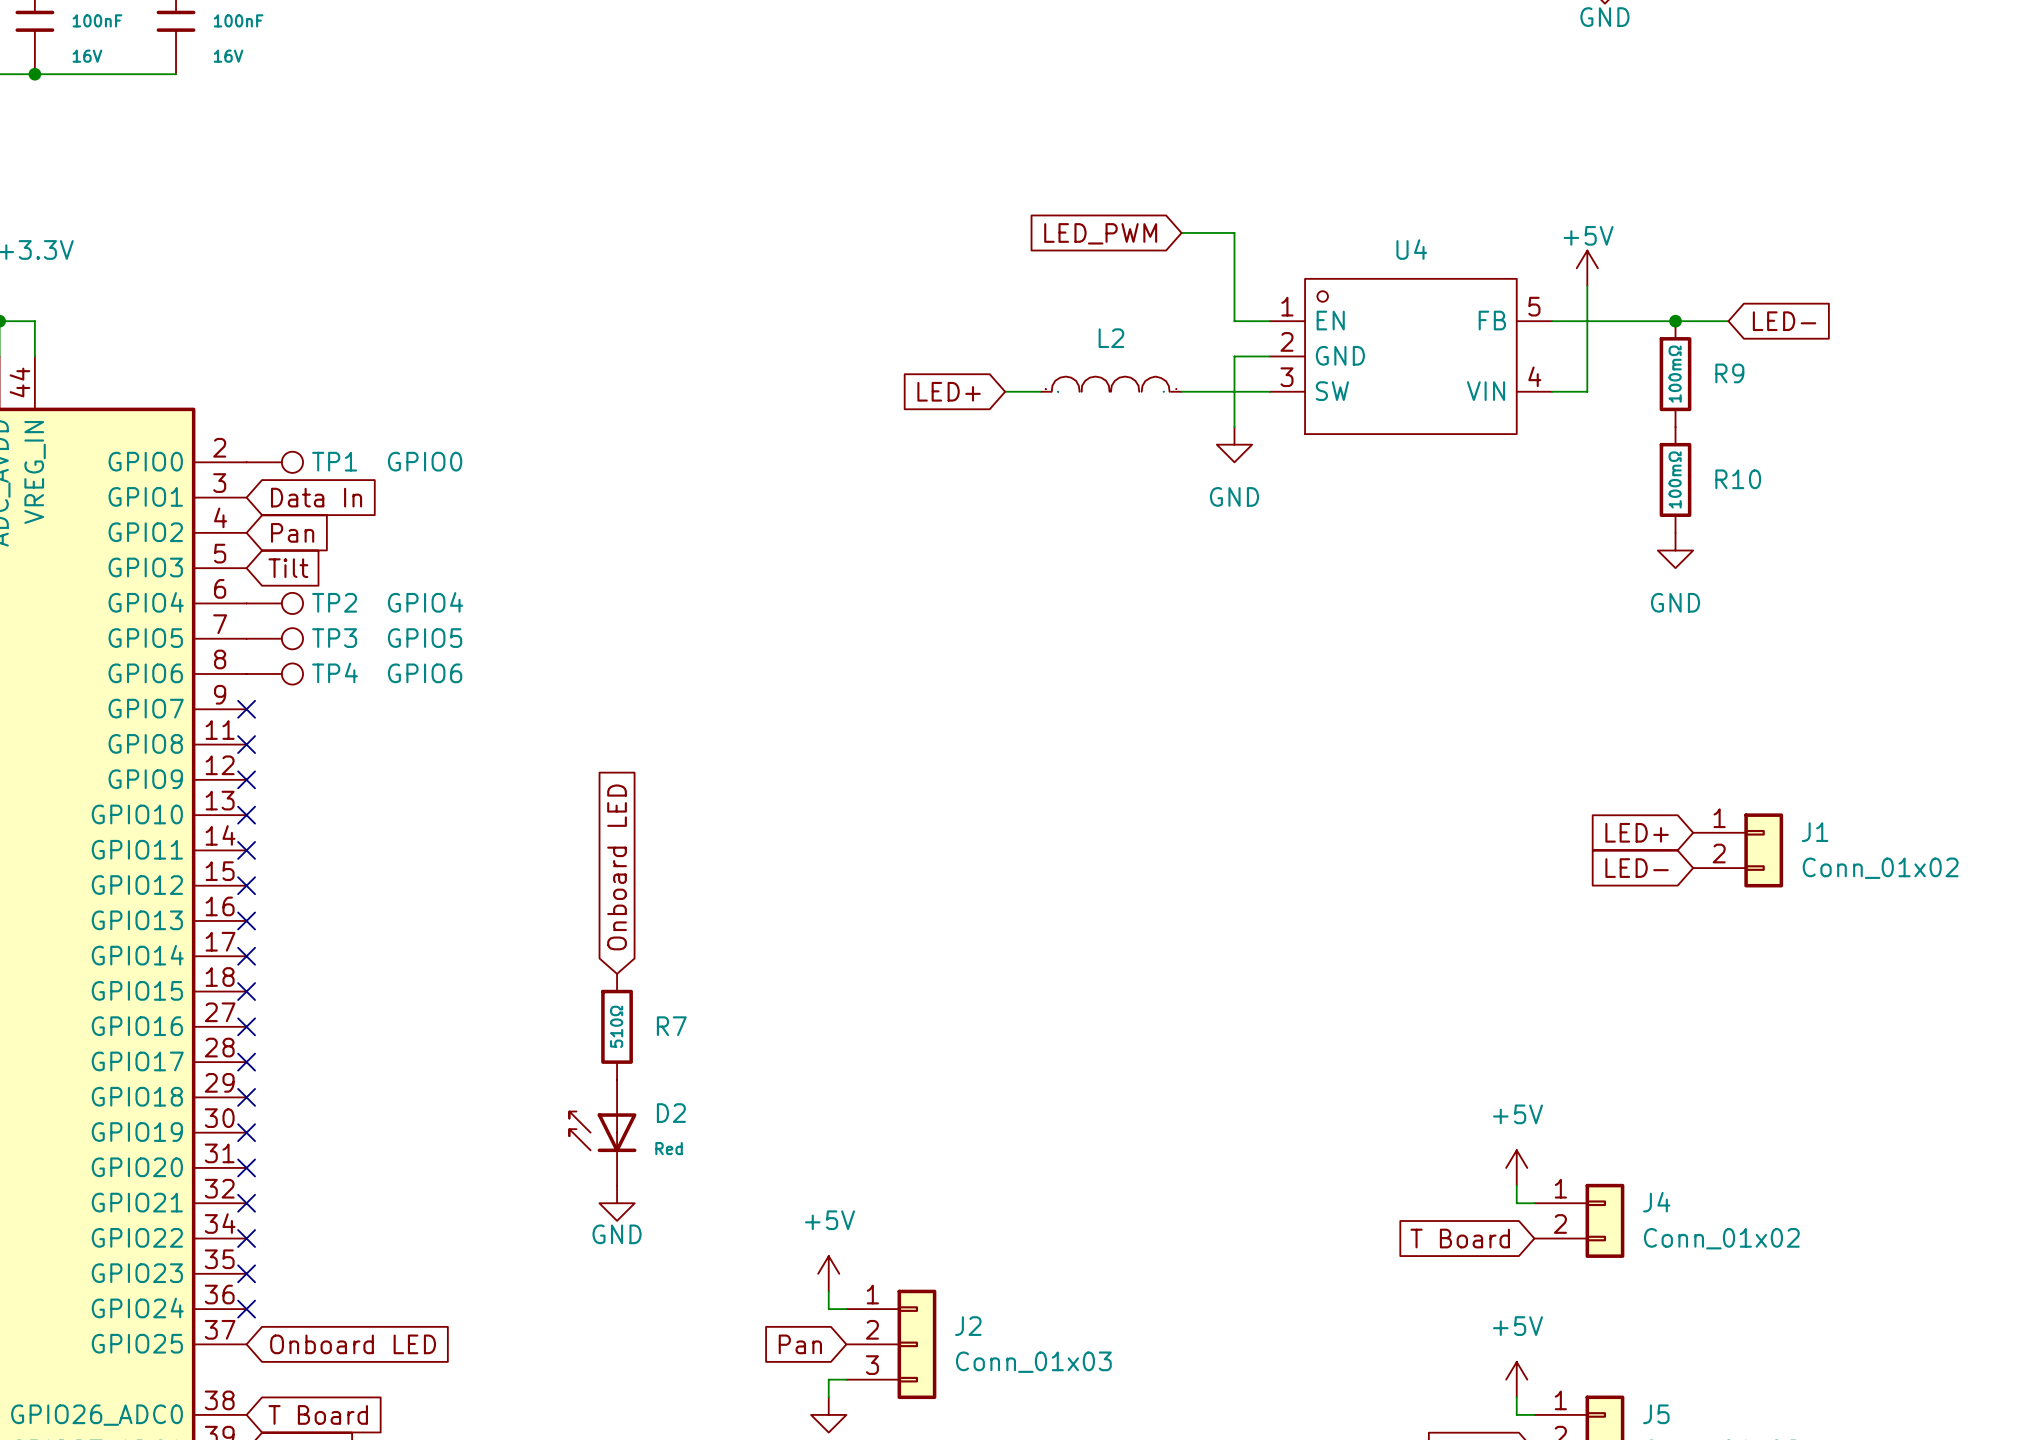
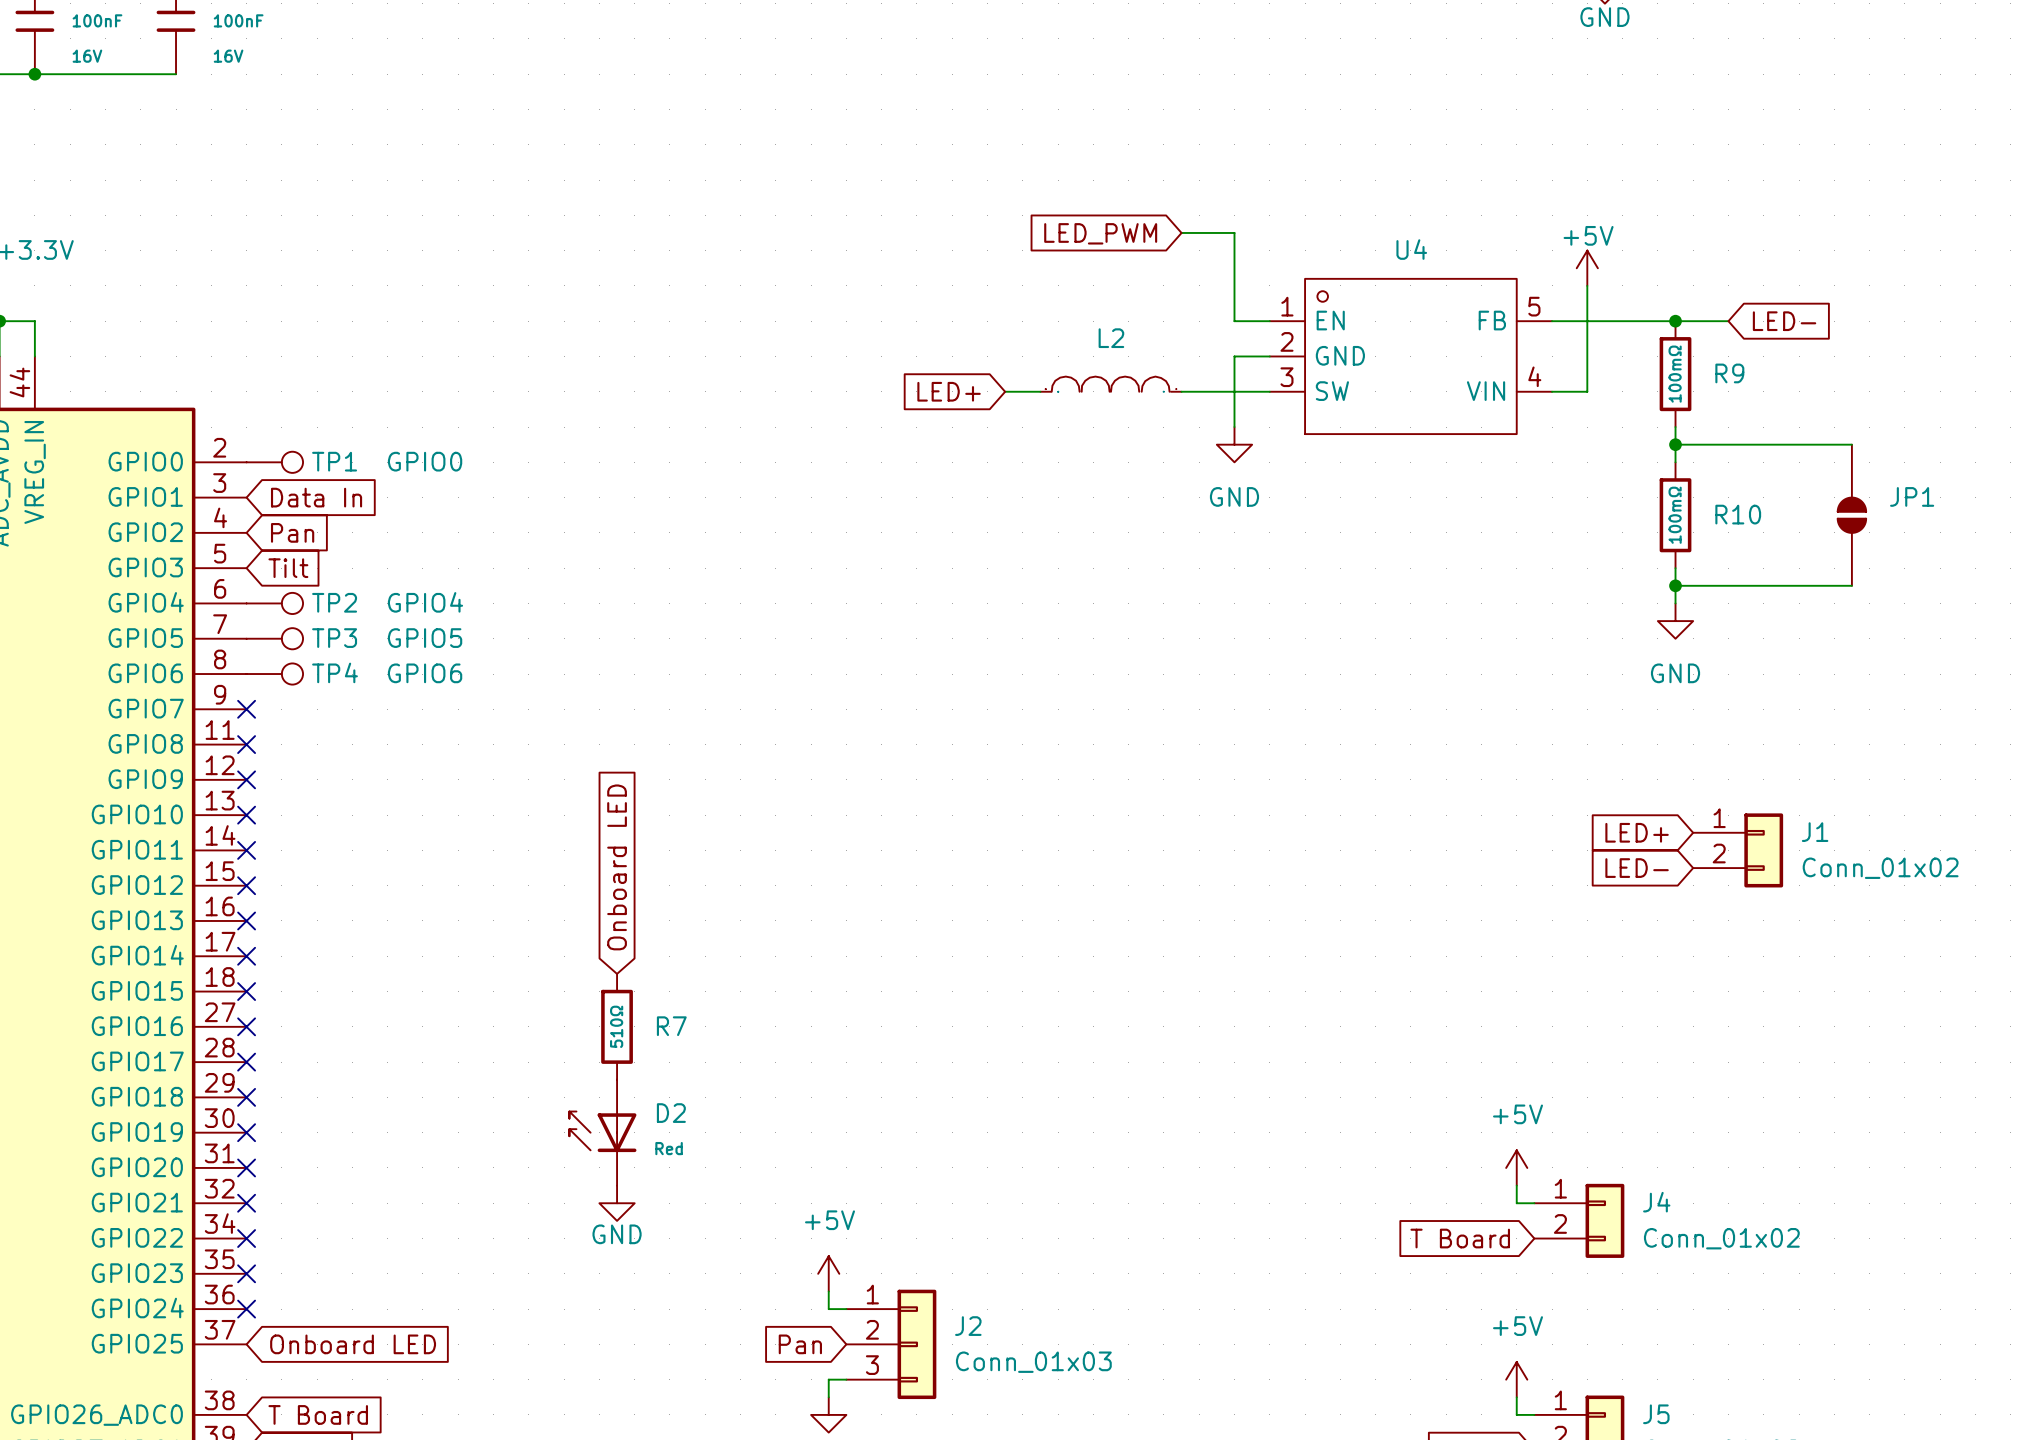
wire: none -> (1675, 444) (1851, 444)
junction: none -> (1675, 444)
R10 position: (1675, 479) -> (1675, 515)
JP1: none -> (1851, 515)
power symbol position: GND (1675, 550) -> GND (1675, 621)
wire: none -> (1675, 568) (1675, 603)
wire: none -> (1675, 585) (1851, 585)
junction: none -> (1675, 585)

